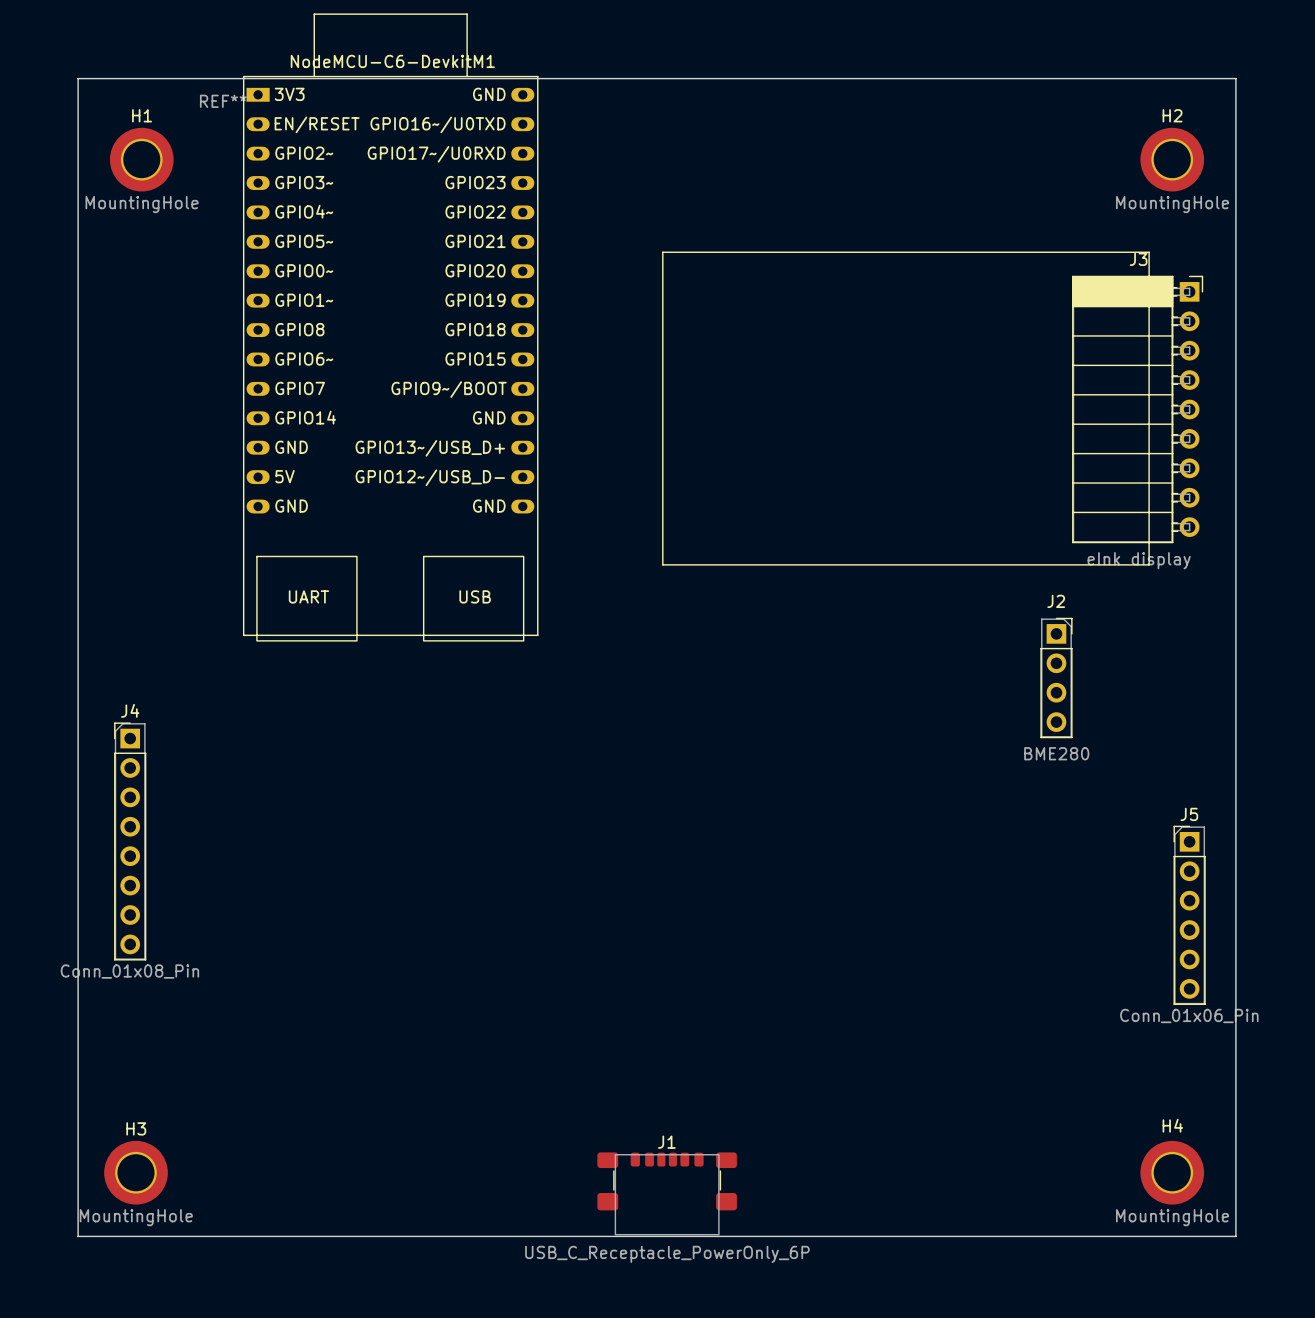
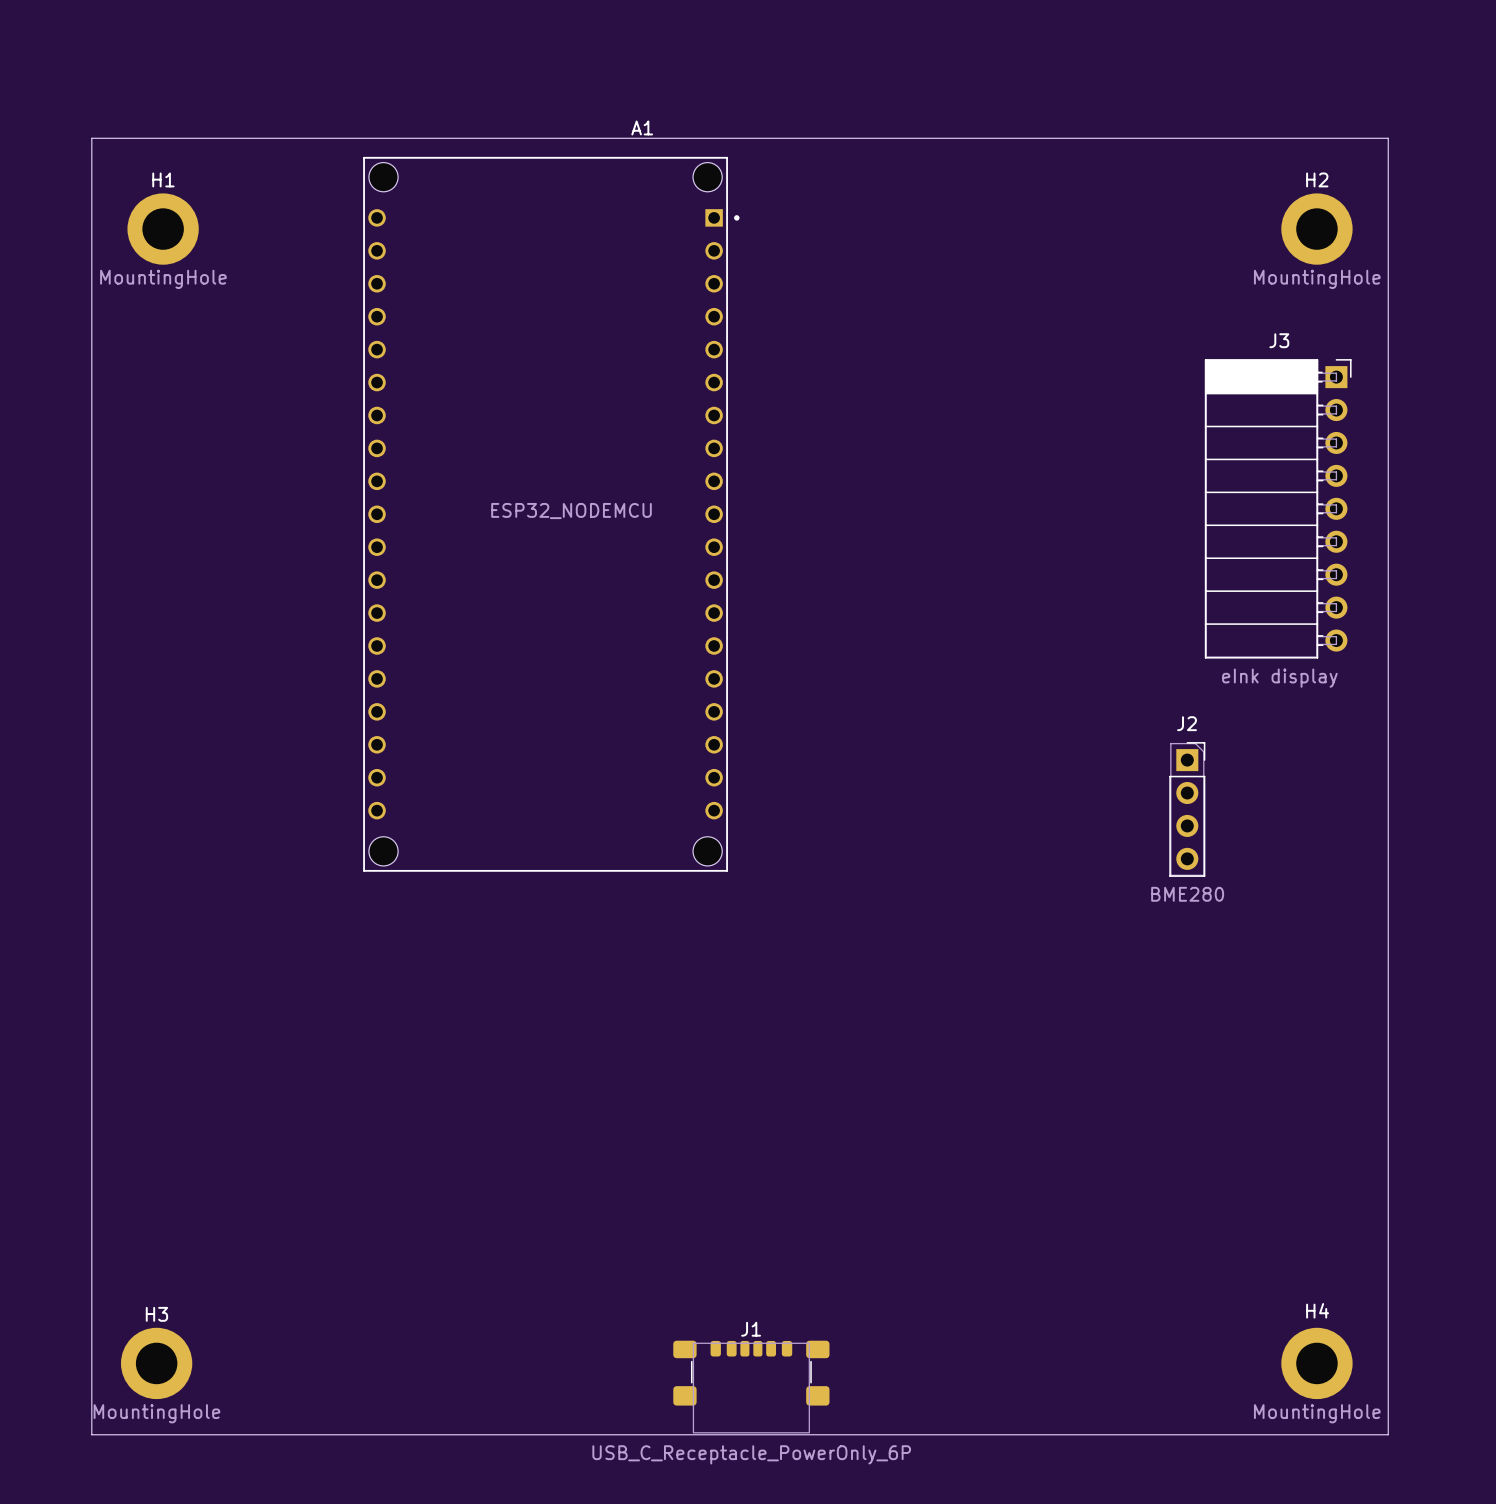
line: (662, 252) (1149, 252) (1149, 564) (662, 564) (662, 252) -> none
NodeMCU-C6-DevkitM1: (390, 327) -> none
A1: none -> ESP32_NODEMCU (551, 514)
J4: Conn_01x08_Pin (130, 841) -> none
J5: Conn_01x06_Pin (1189, 915) -> none

